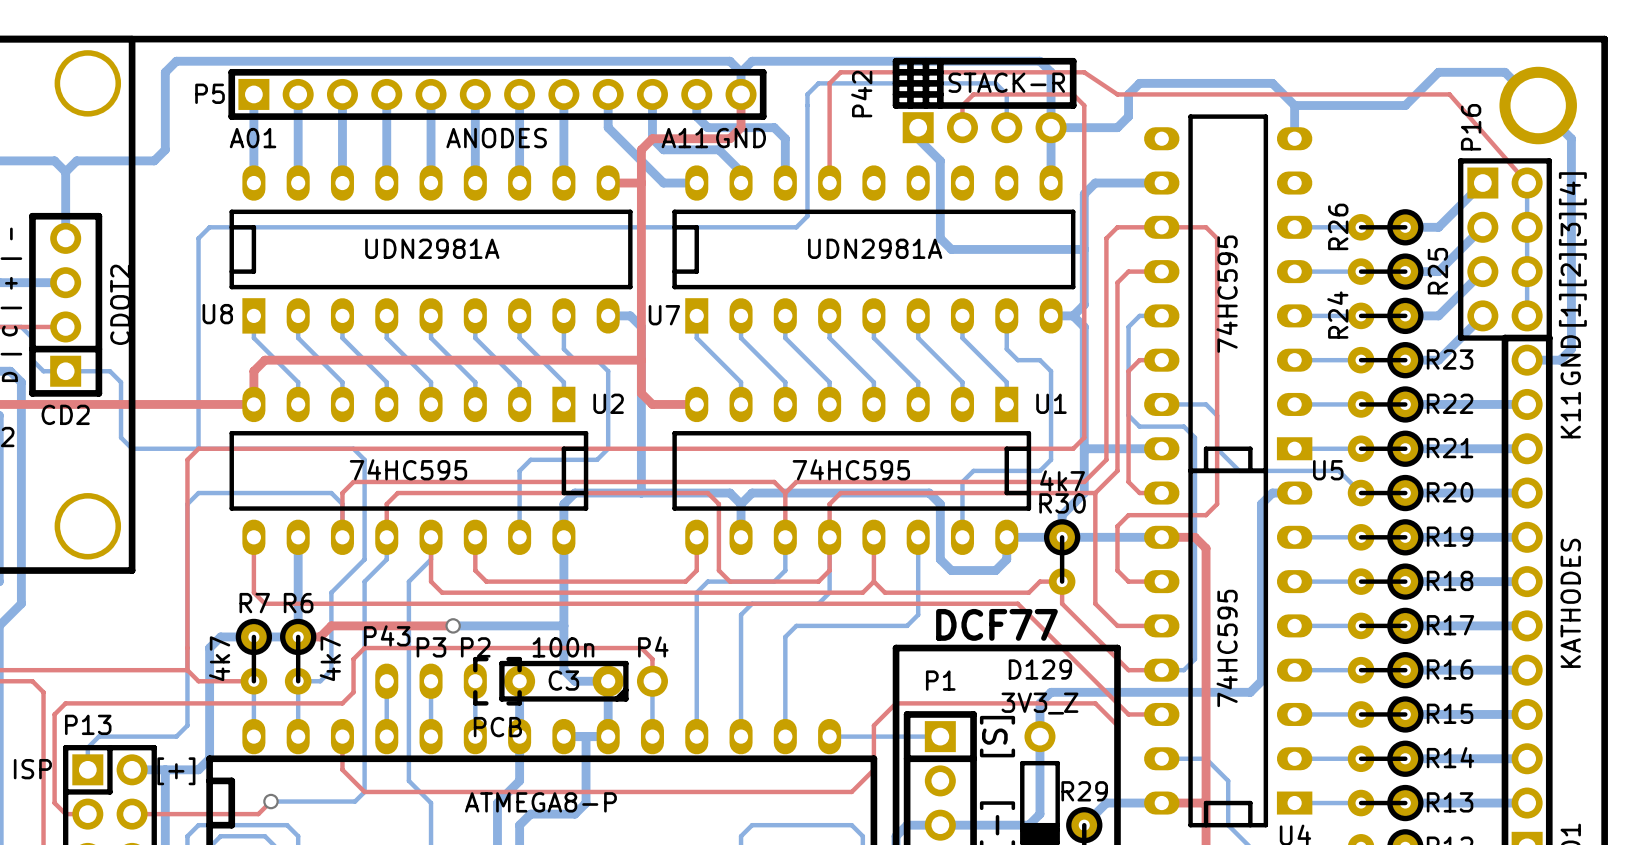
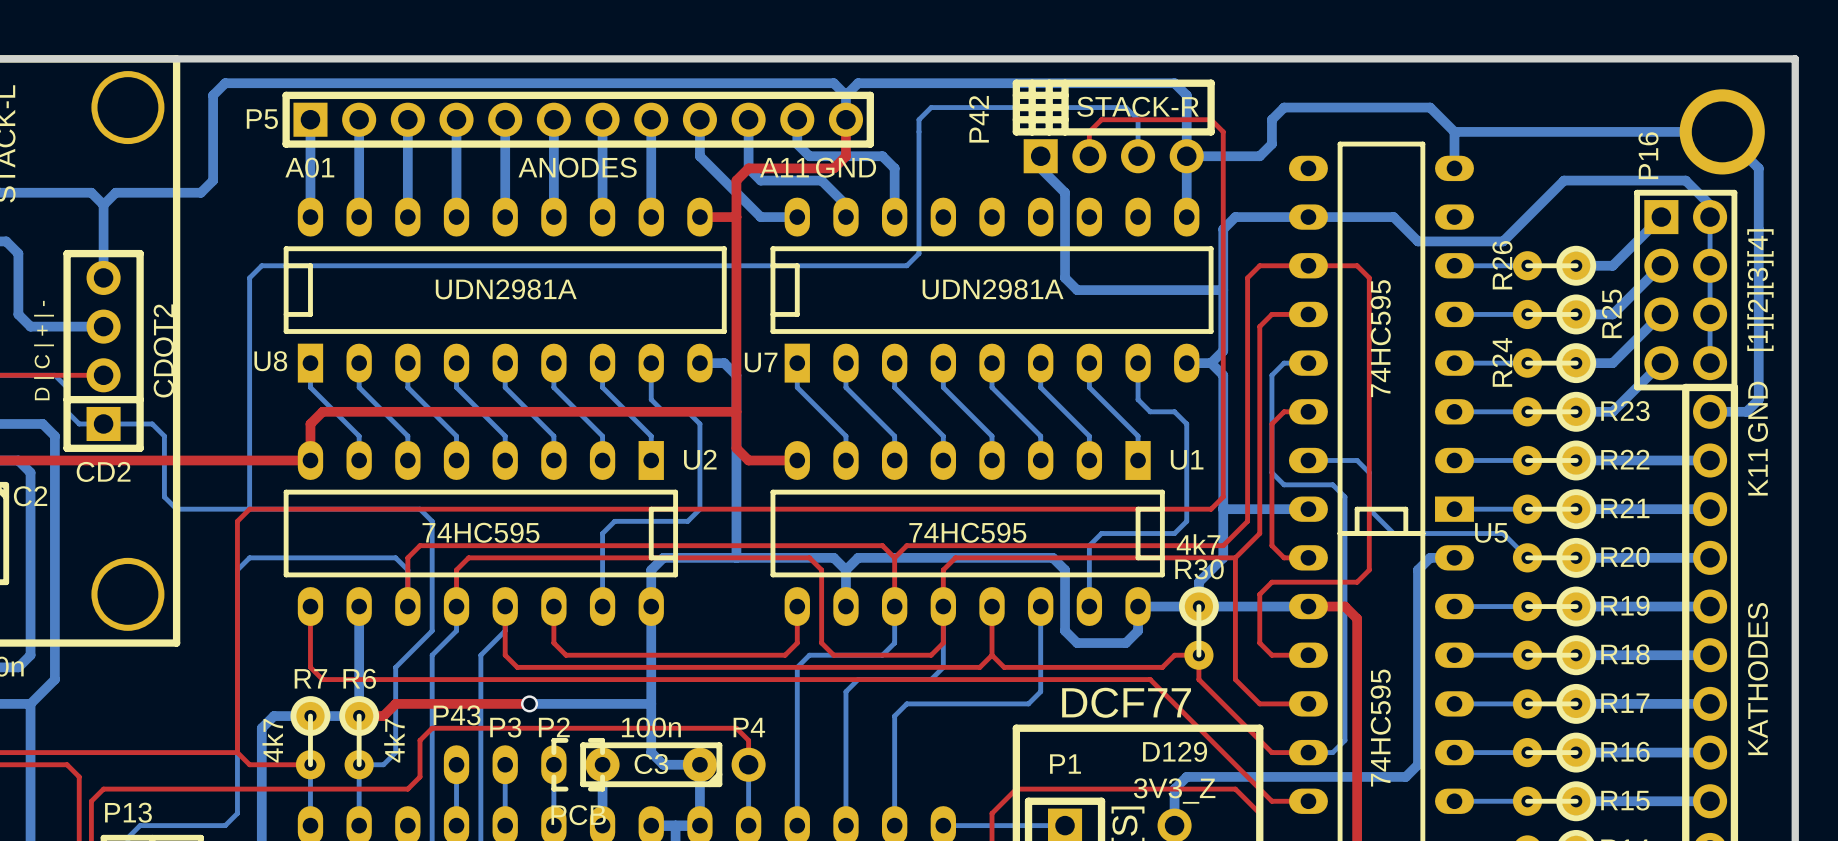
bottom track: (1405, 105) (1438, 72) (1504, 72) (1538, 105) -> (1576, 131) (1722, 131)
top track: (829, 183) (829, 83) (840, 72) (1084, 72) (1117, 94) (1449, 94) (1527, 183) -> none
bottom track: none -> (1308, 217) (1393, 217) (1417, 241) (1503, 241) (1564, 180) (1685, 180) (1710, 204) (1710, 217)

